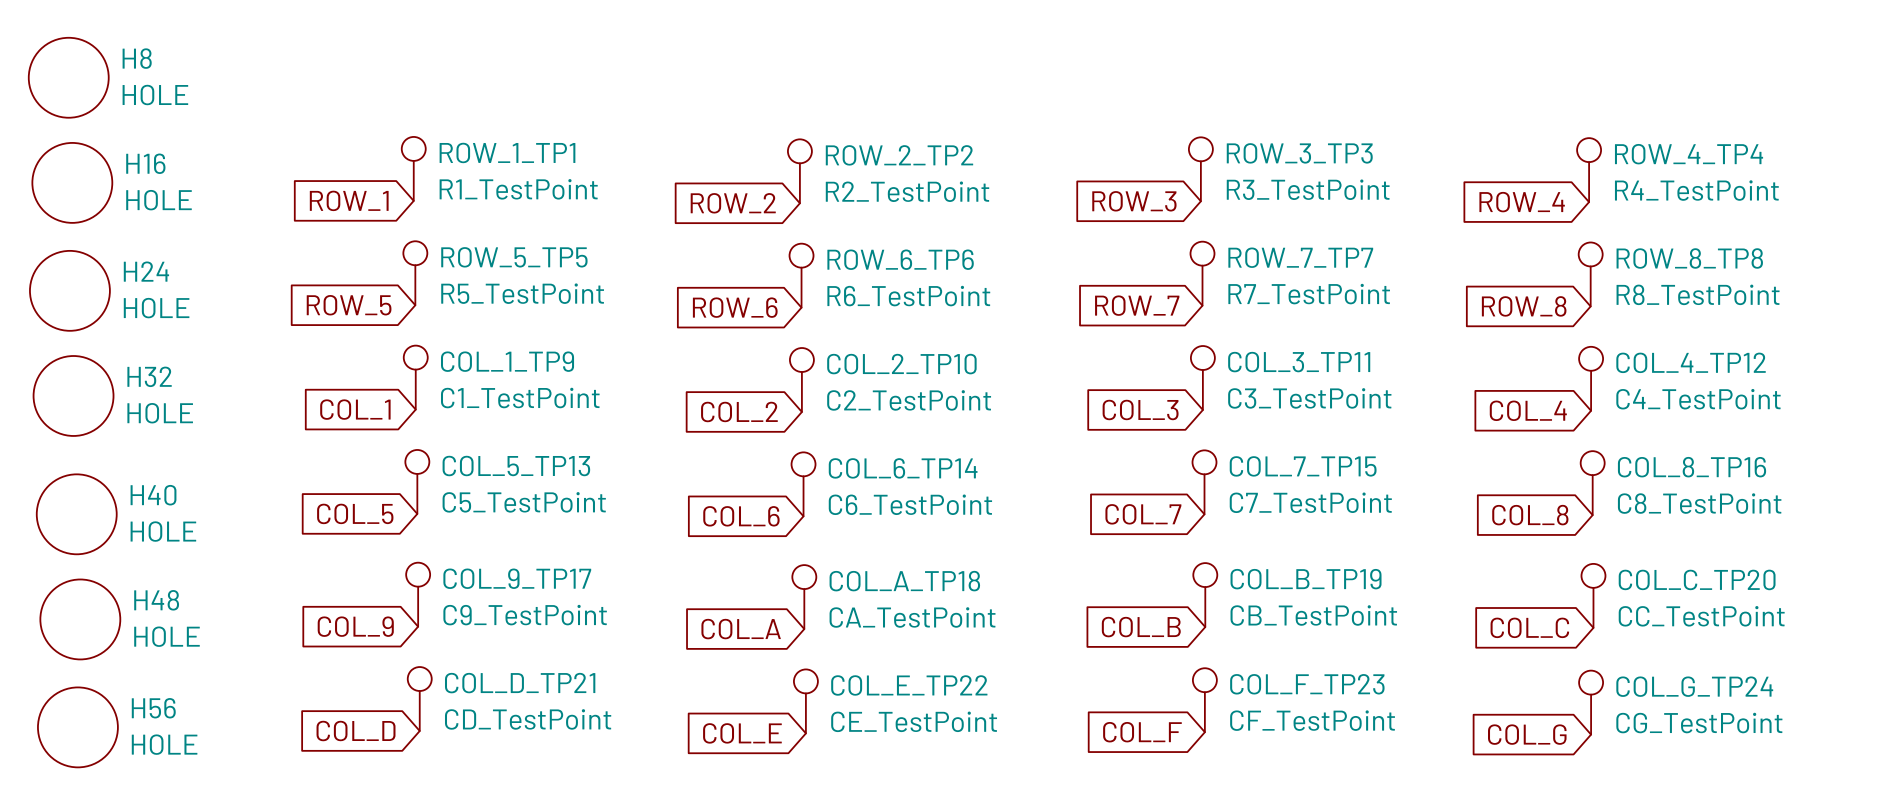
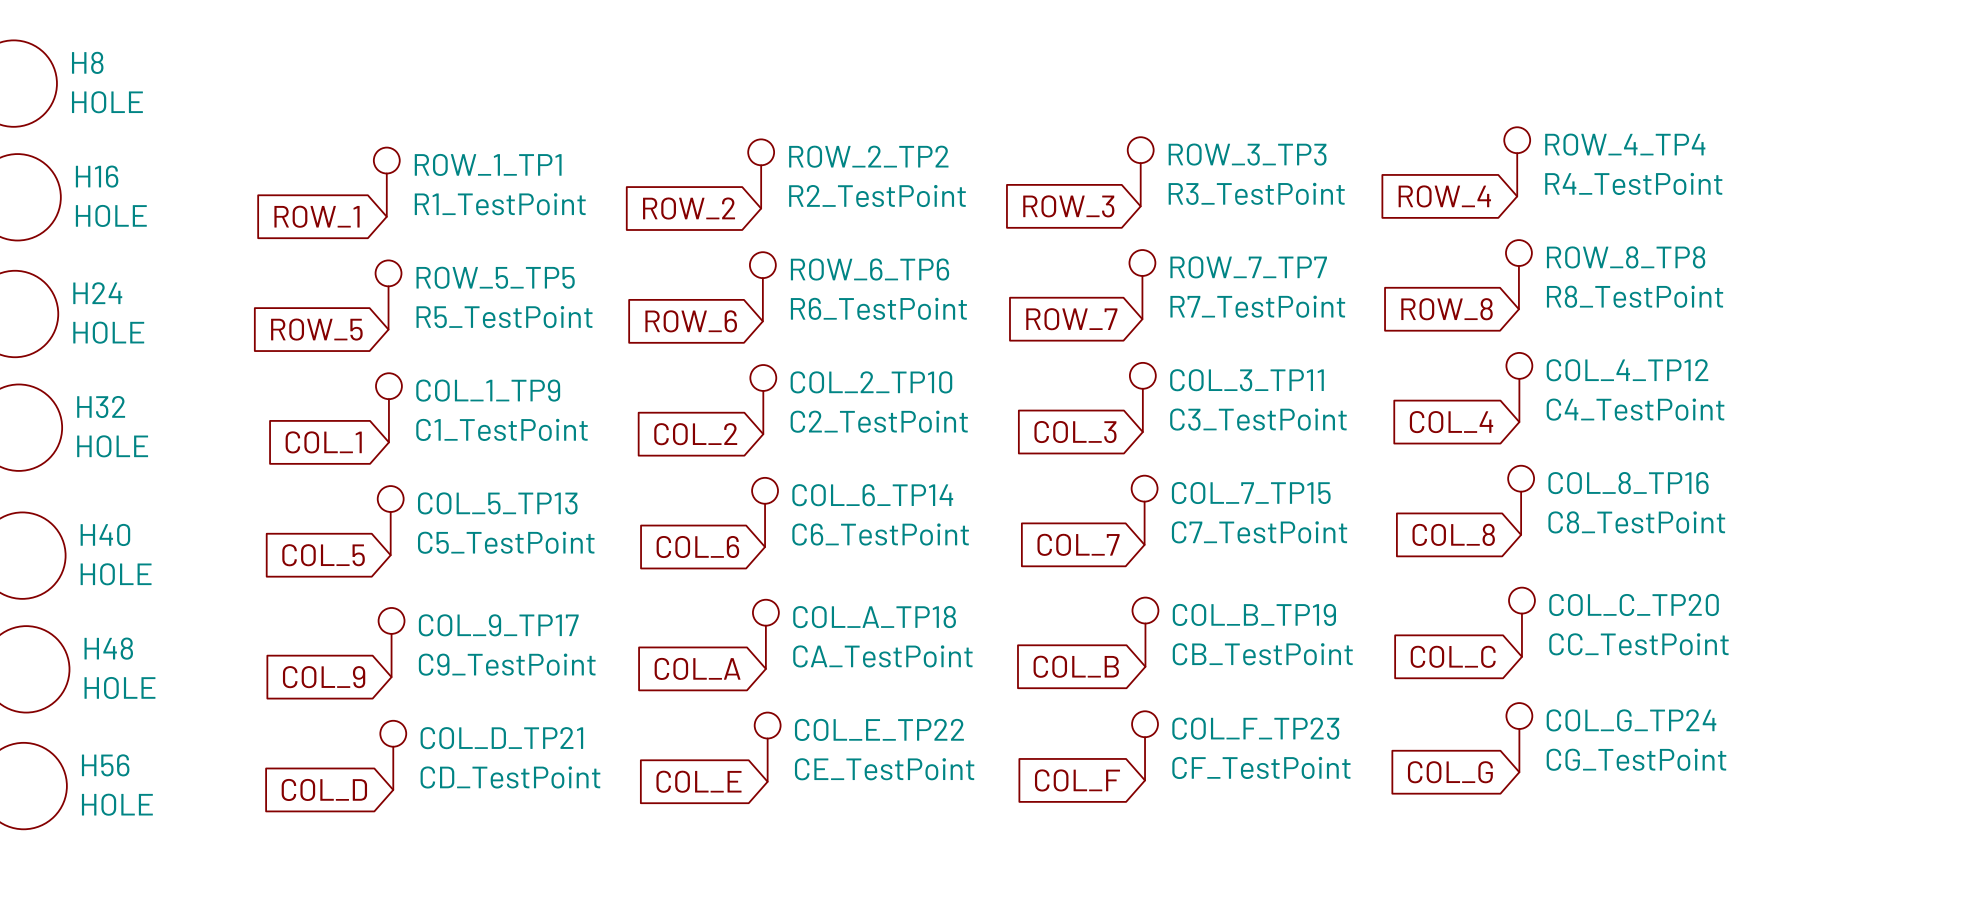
ROW_3_TP3 position: (1200, 169) -> (1140, 171)
ROW_4_TP4 position: (1589, 170) -> (1517, 161)
ROW_2_TP2 position: (799, 171) -> (761, 173)
global label position: ROW_3 (1134, 201) -> ROW_3 (1068, 206)
global label position: ROW_4 (1522, 202) -> ROW_4 (1444, 196)
global label position: ROW_2 (733, 203) -> ROW_2 (689, 208)
ROW_7_TP7 position: (1202, 273) -> (1142, 284)
ROW_8_TP8 position: (1590, 274) -> (1518, 274)
ROW_6_TP6 position: (801, 275) -> (762, 286)
global label position: ROW_7 (1137, 305) -> ROW_7 (1071, 319)
global label position: ROW_8 (1524, 306) -> ROW_8 (1447, 309)
global label position: ROW_6 (735, 307) -> ROW_6 (691, 321)
COL_3_TP11 position: (1202, 377) -> (1142, 397)
COL_4_TP12 position: (1591, 378) -> (1519, 387)
COL_2_TP10 position: (801, 379) -> (763, 399)
global label position: COL_3 (1140, 409) -> COL_3 (1075, 432)
global label position: COL_4 (1528, 410) -> COL_4 (1451, 422)
global label position: COL_2 (739, 411) -> COL_2 (695, 434)
COL_7_TP15 position: (1204, 482) -> (1144, 510)
COL_8_TP16 position: (1592, 483) -> (1521, 500)
COL_6_TP14 position: (803, 484) -> (765, 512)
global label position: COL_7 (1143, 514) -> COL_7 (1078, 544)
global label position: COL_8 (1530, 515) -> COL_8 (1453, 534)
global label position: COL_6 (741, 516) -> COL_6 (697, 547)
COL_B_TP19 position: (1205, 595) -> (1145, 632)
COL_C_TP20 position: (1593, 595) -> (1521, 622)
COL_A_TP18 position: (804, 597) -> (765, 634)
global label position: COL_B (1141, 627) -> COL_B (1076, 666)
global label position: COL_C (1529, 627) -> COL_C (1453, 656)
global label position: COL_A (741, 629) -> COL_A (697, 668)
COL_F_TP23 position: (1204, 700) -> (1145, 745)
COL_E_TP22 position: (805, 701) -> (767, 747)
COL_G_TP24 position: (1591, 702) -> (1519, 737)
global label position: COL_F (1142, 732) -> COL_F (1077, 780)
global label position: COL_E (742, 733) -> COL_E (698, 781)
global label position: COL_G (1527, 734) -> COL_G (1450, 772)

